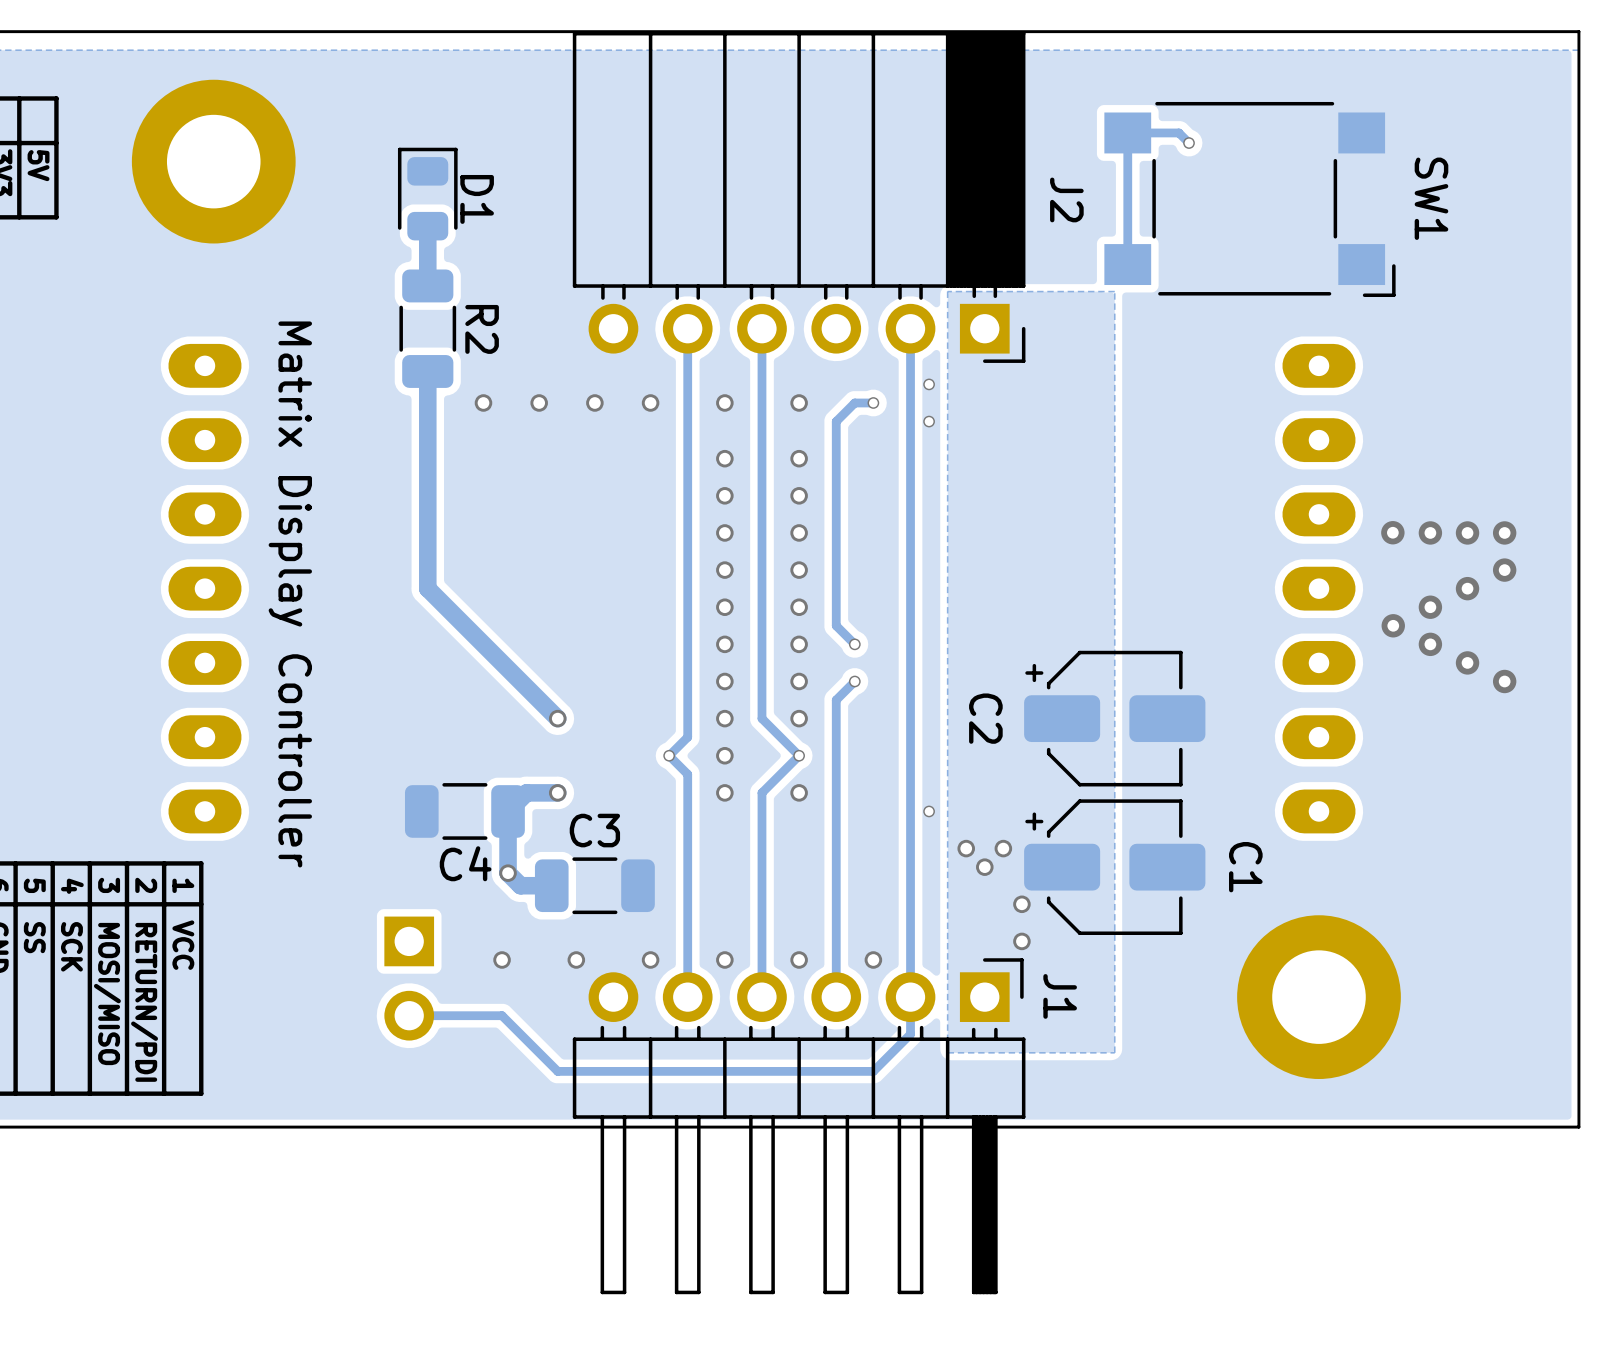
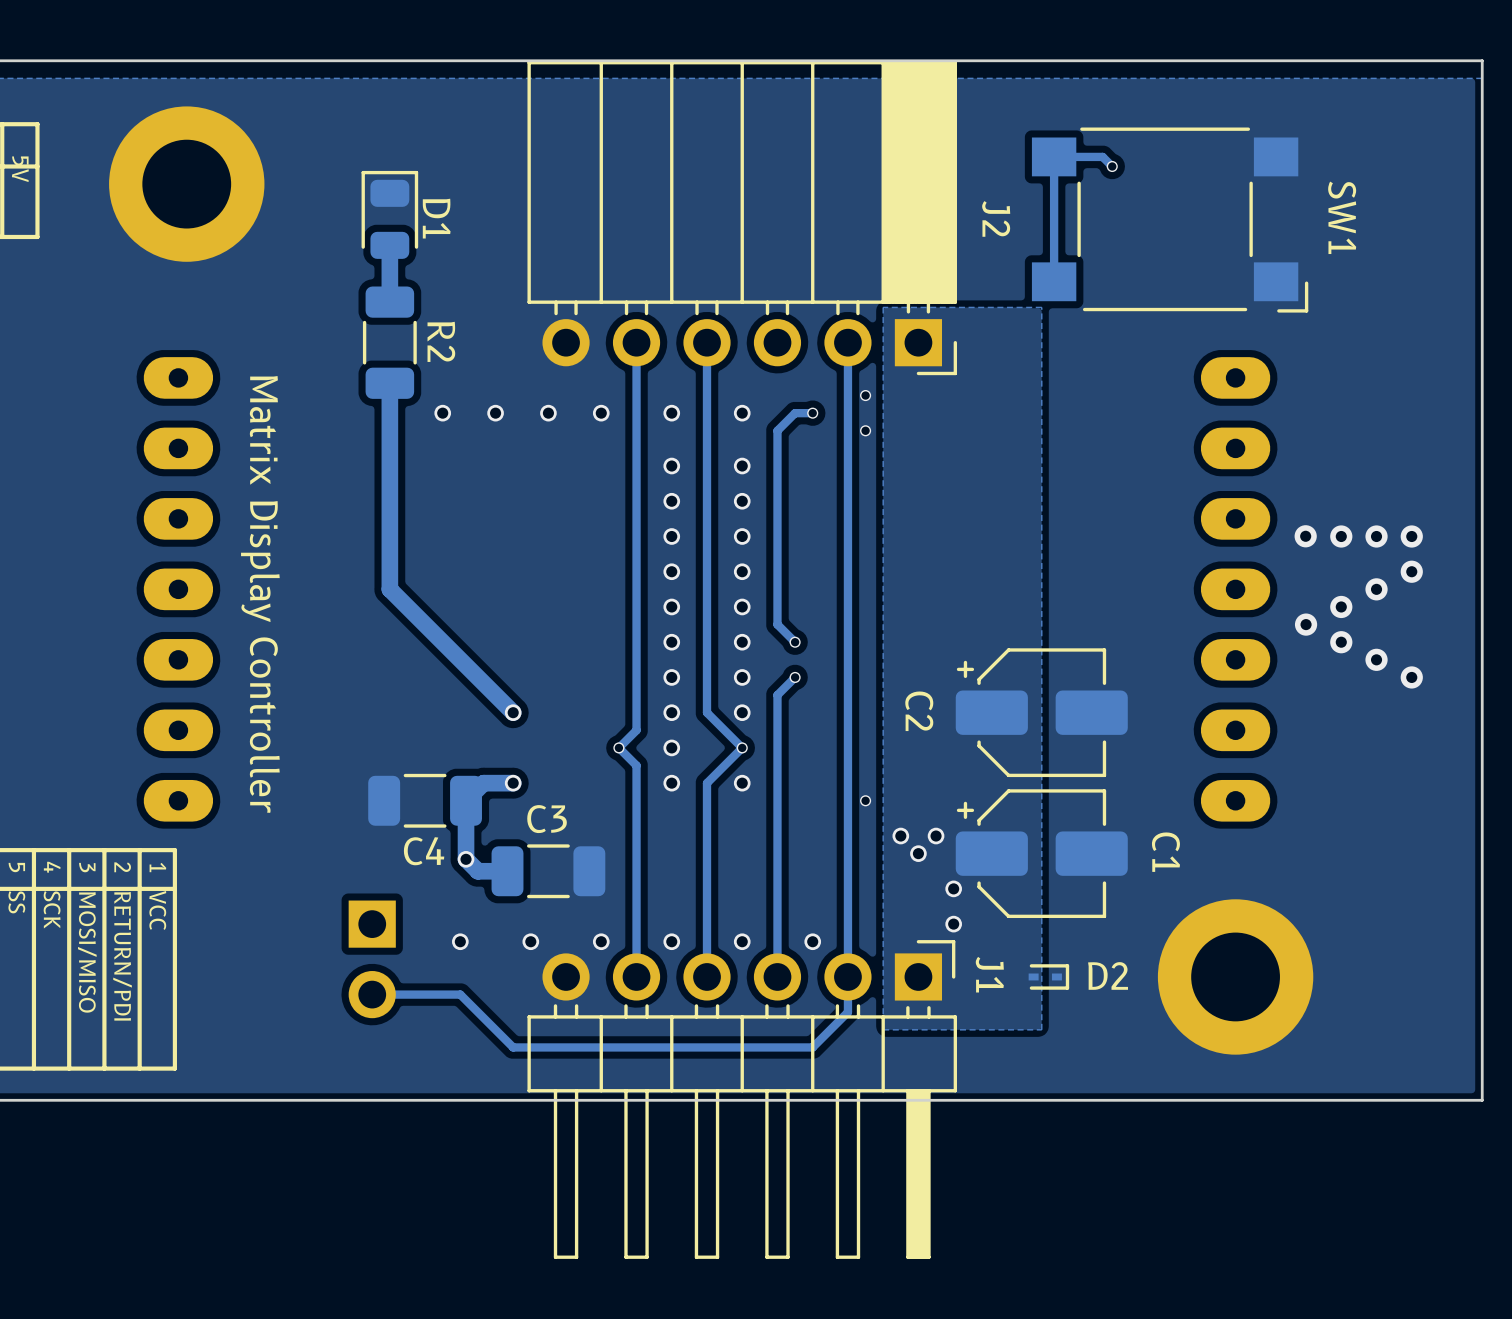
D2: none -> (1048, 976)

